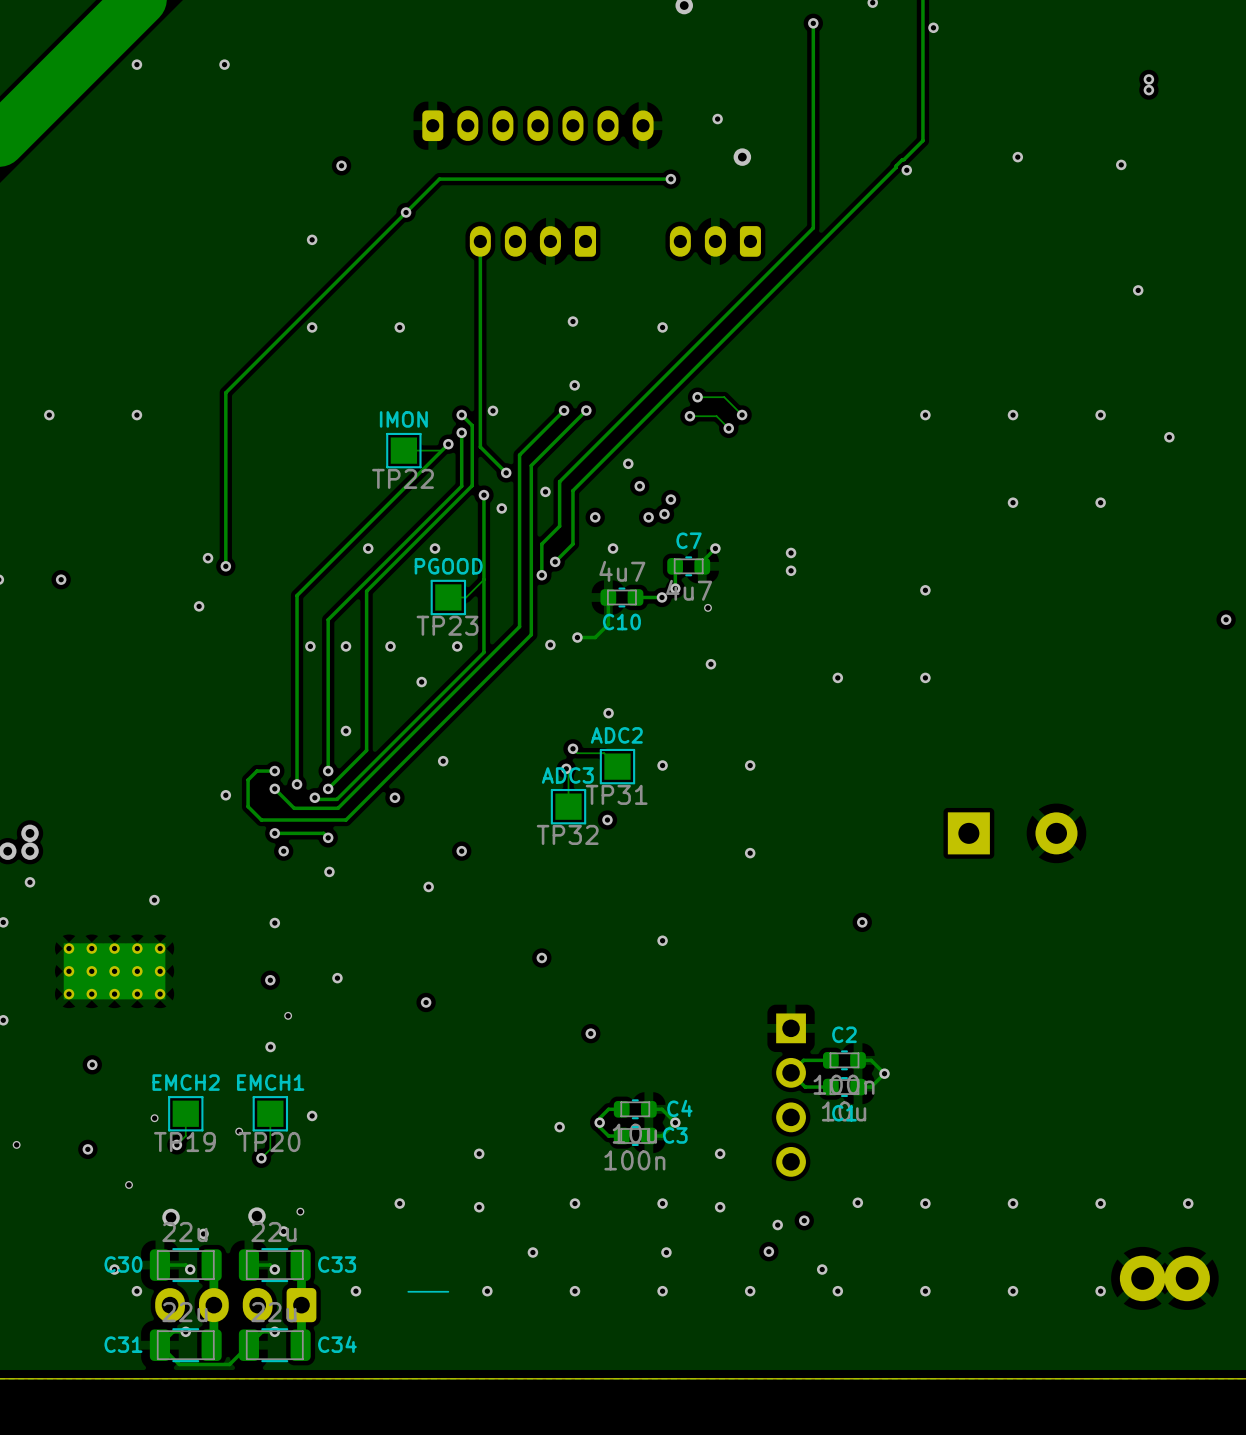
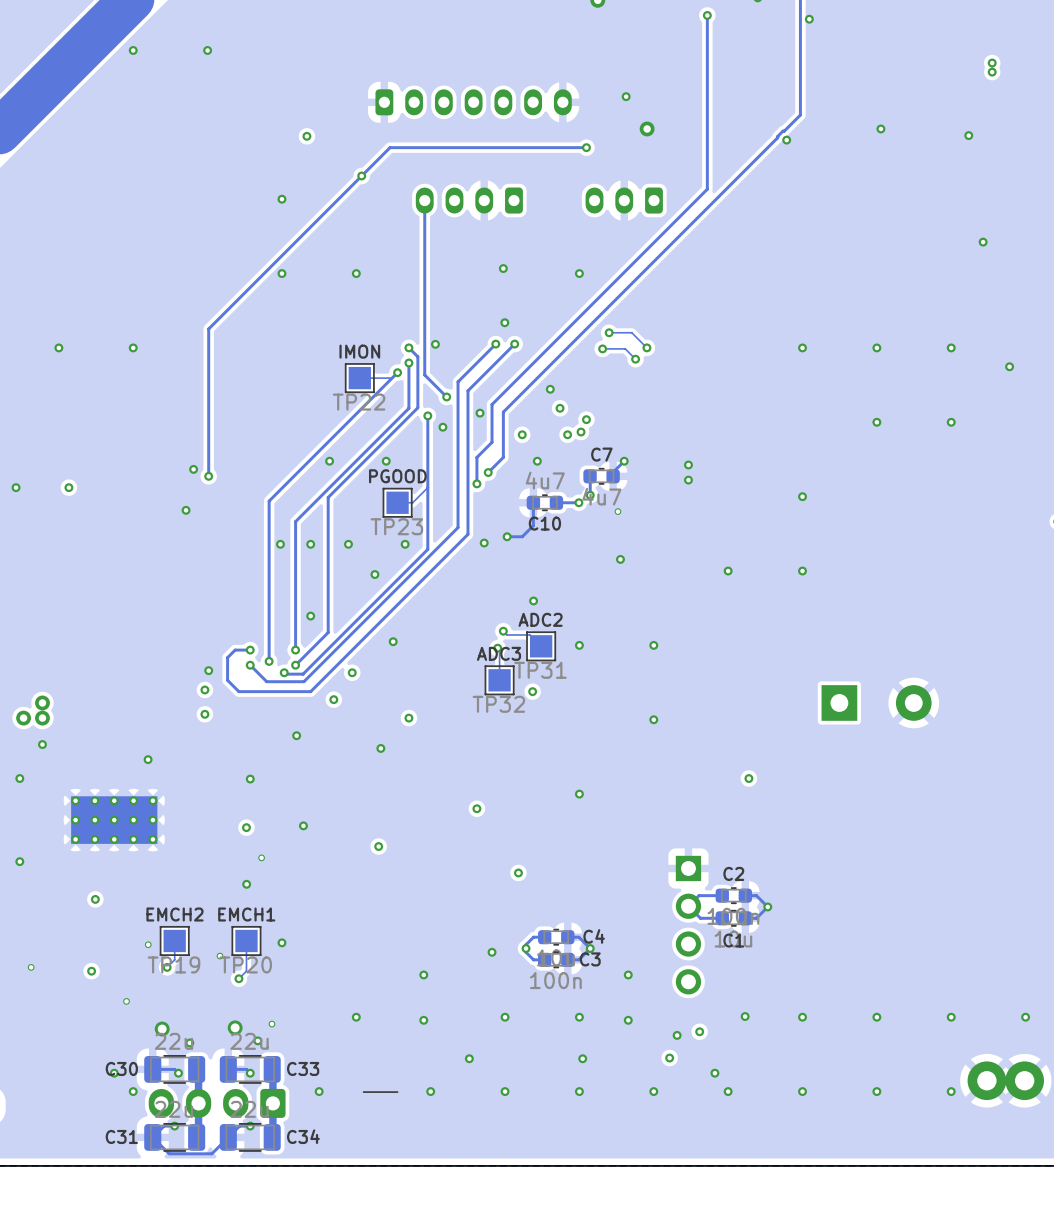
via: none -> (204, 689)
track: (274, 833) (323, 833) (328, 837) -> none
via: (274, 833) -> none
via position: (328, 837) -> (333, 699)
via: none -> (204, 714)
via: (283, 851) -> none

